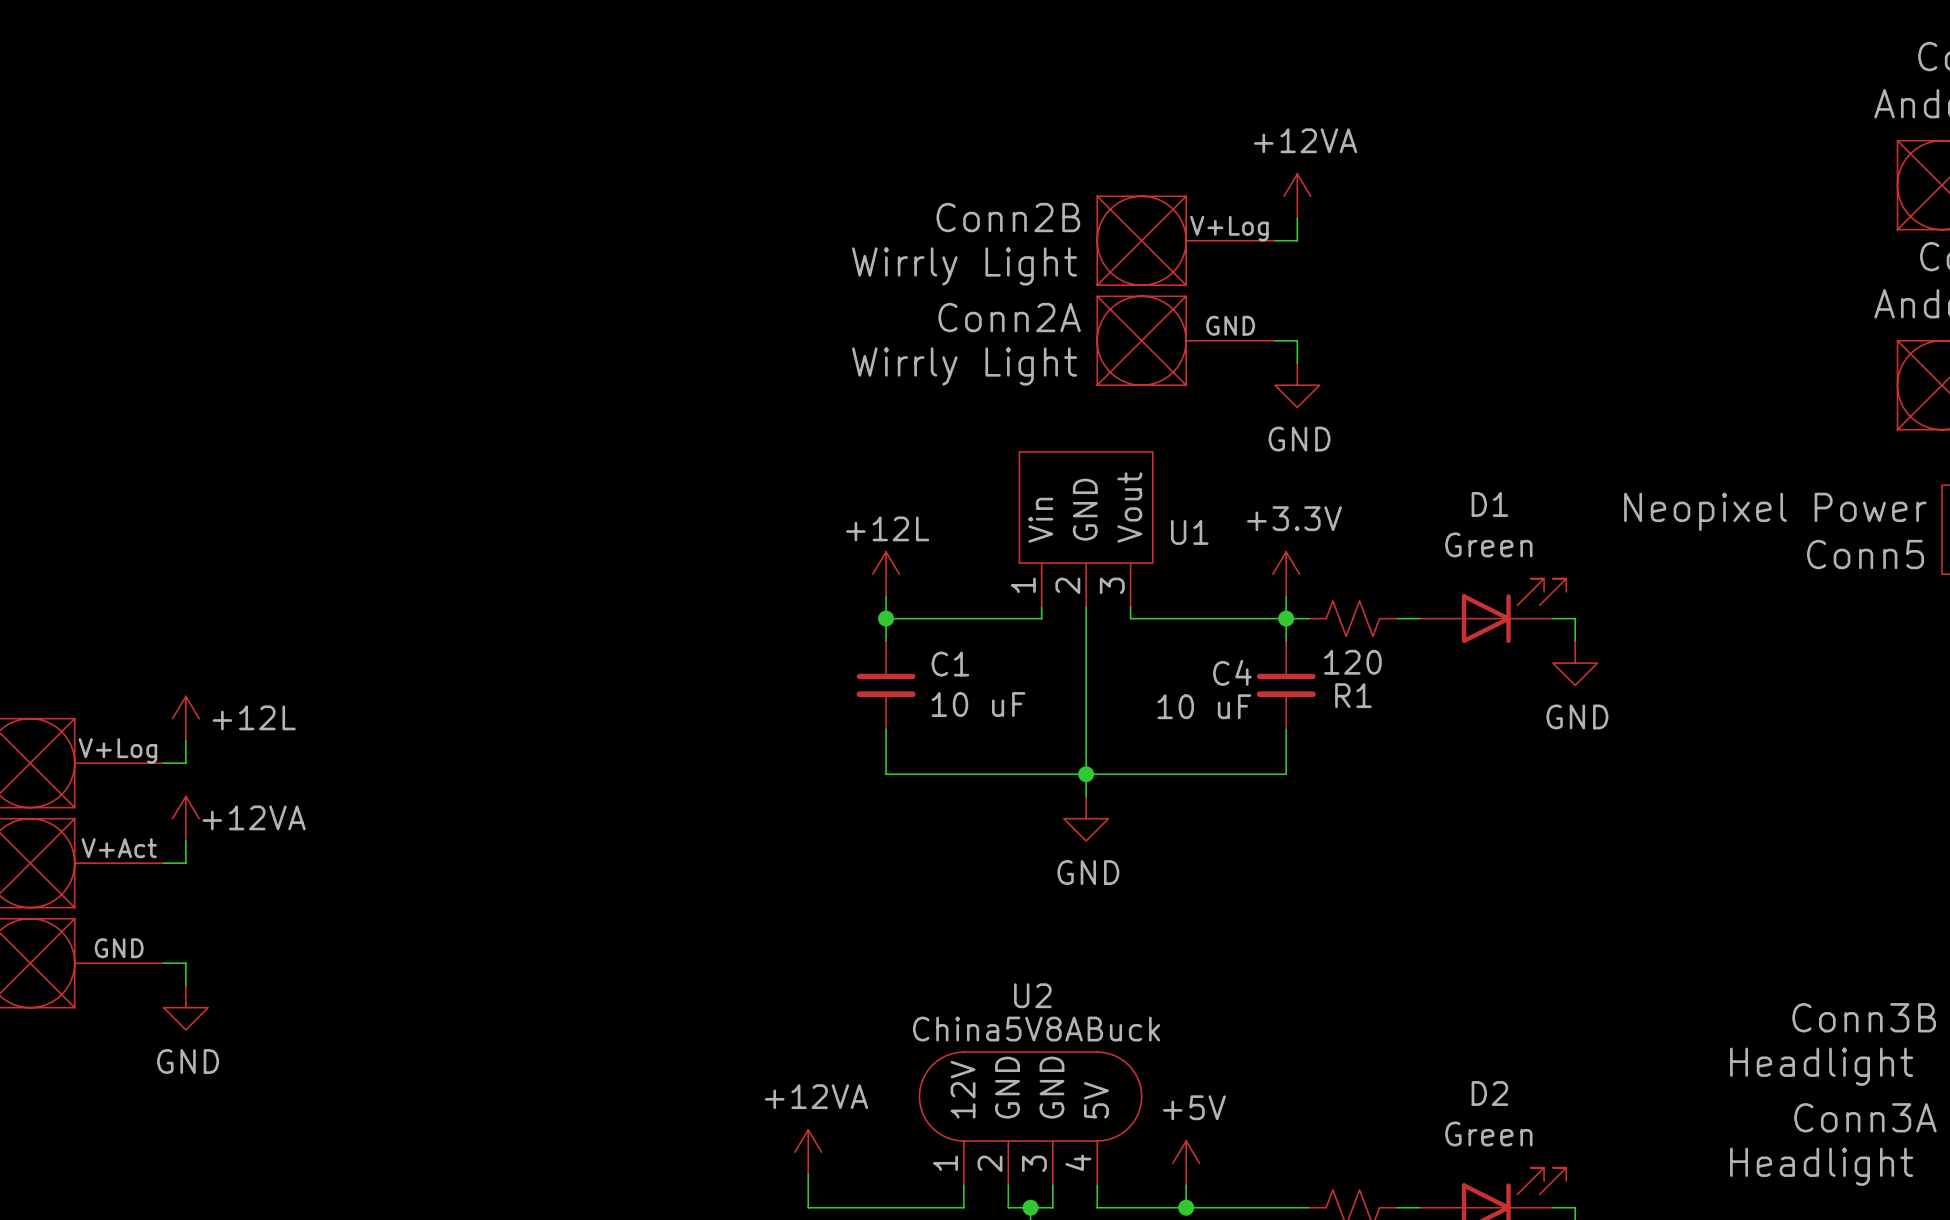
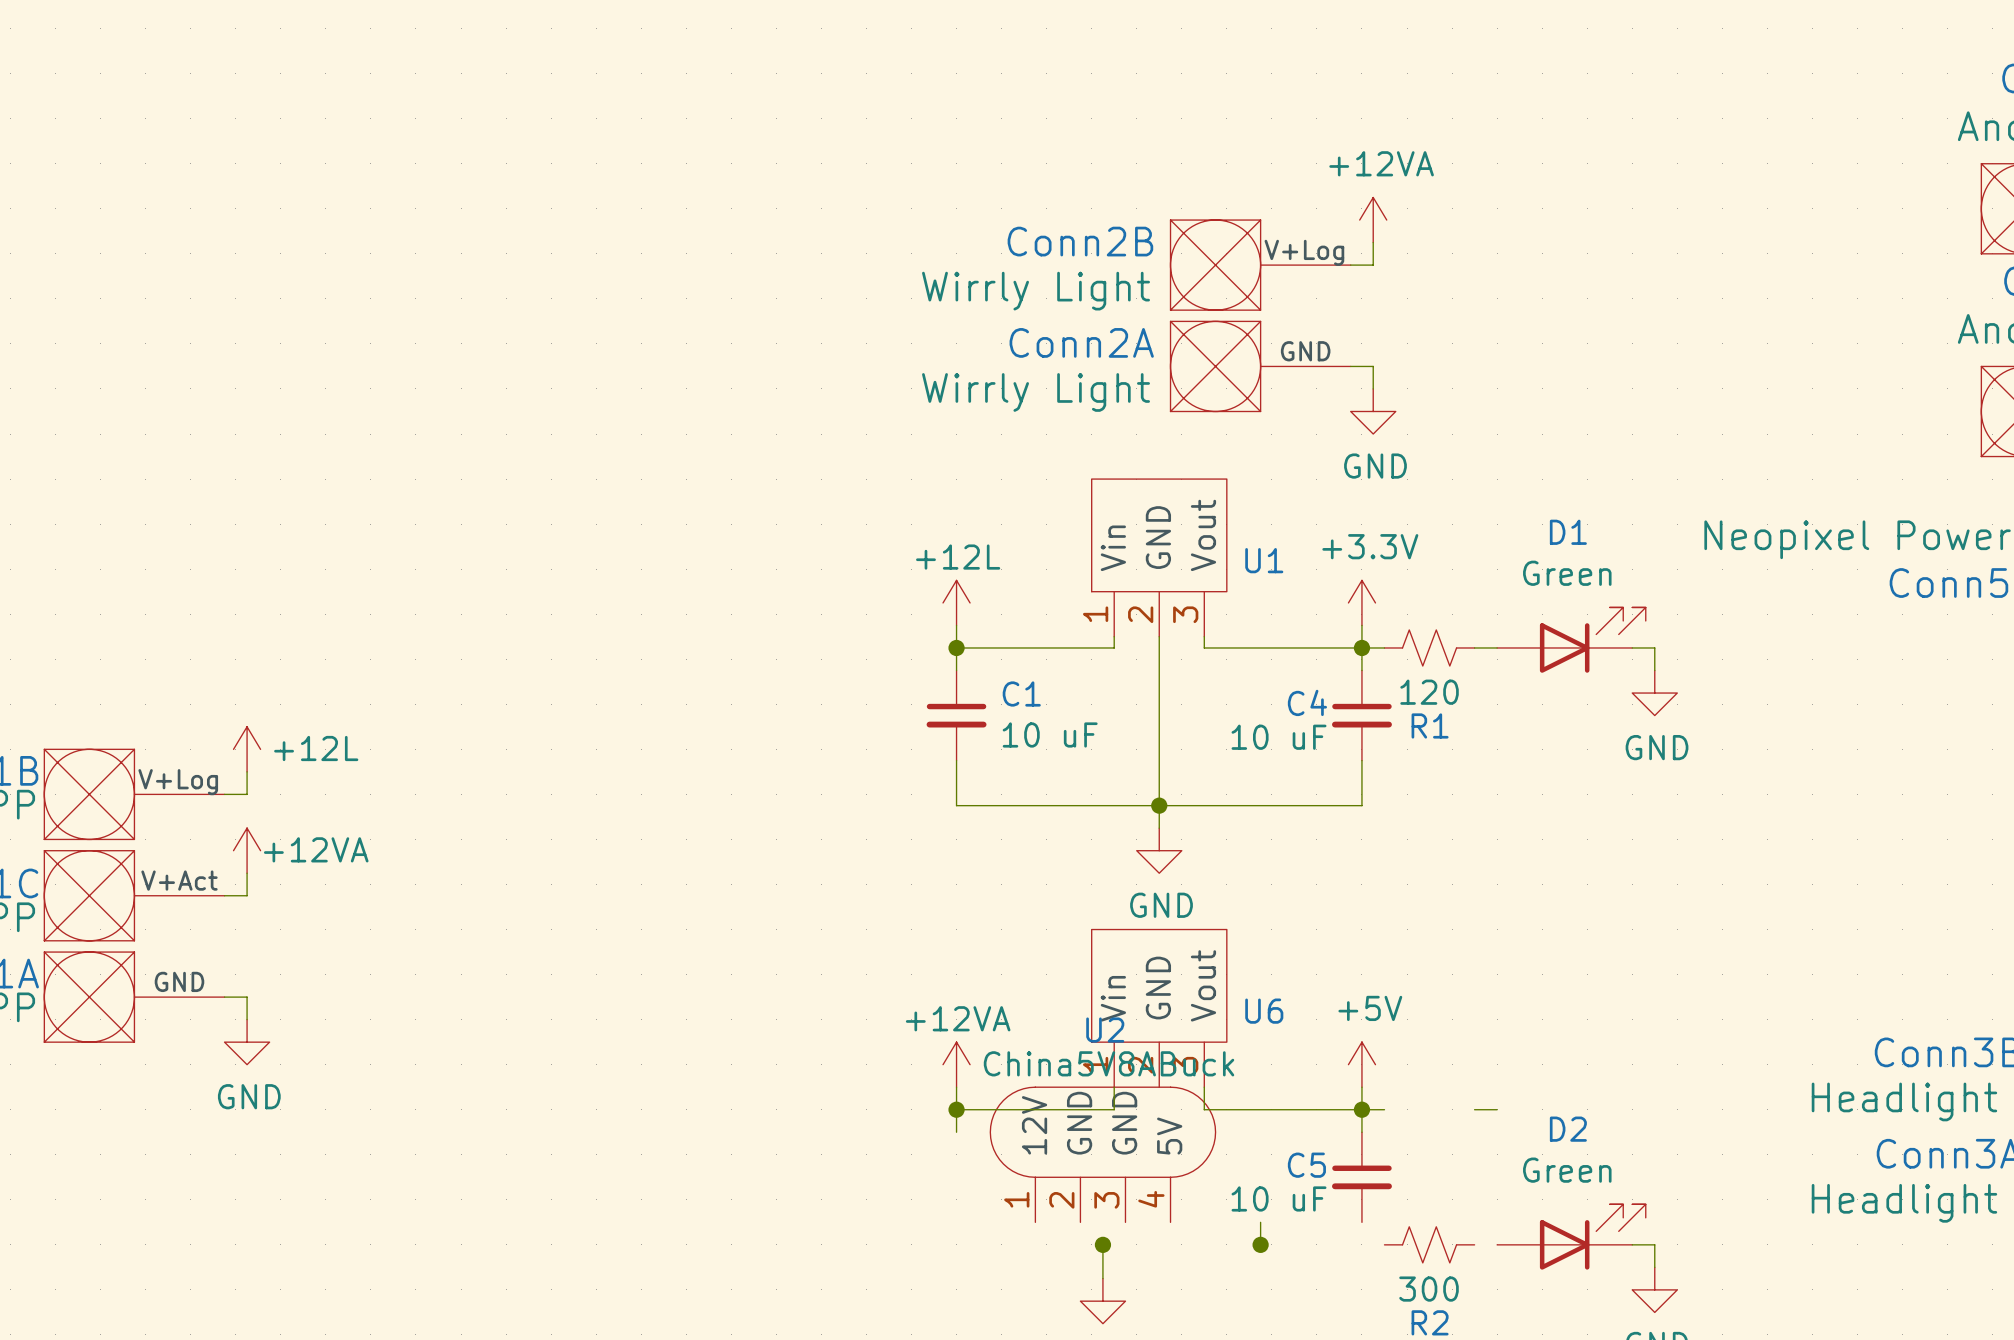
U6: none -> (1159, 1008)
wire: none -> (956, 1087) (956, 1132)
wire: none -> (1114, 1087) (1114, 1109) (956, 1109)
wire: none -> (1204, 1087) (1204, 1109) (1384, 1109)
wire: none -> (1361, 1087) (1361, 1132)
junction: none -> (956, 1109)
junction: none -> (1361, 1109)
power symbol text position: +12VA (816, 1096) -> +12VA (958, 1018)
C5: none -> 10 uF (1361, 1177)
power symbol position: +12VA (808, 1152) -> +12VA (956, 1064)
power symbol position: +5V (1186, 1163) -> +5V (1361, 1064)
wire: (808, 1174) (808, 1207) (963, 1207) (963, 1185) -> none
wire: (1008, 1185) (1008, 1207) (1052, 1207) (1052, 1185) -> none
wire: (1097, 1185) (1097, 1207) (1308, 1207) -> none
wire: (1397, 1207) (1419, 1207) -> (1474, 1109) (1497, 1109)

